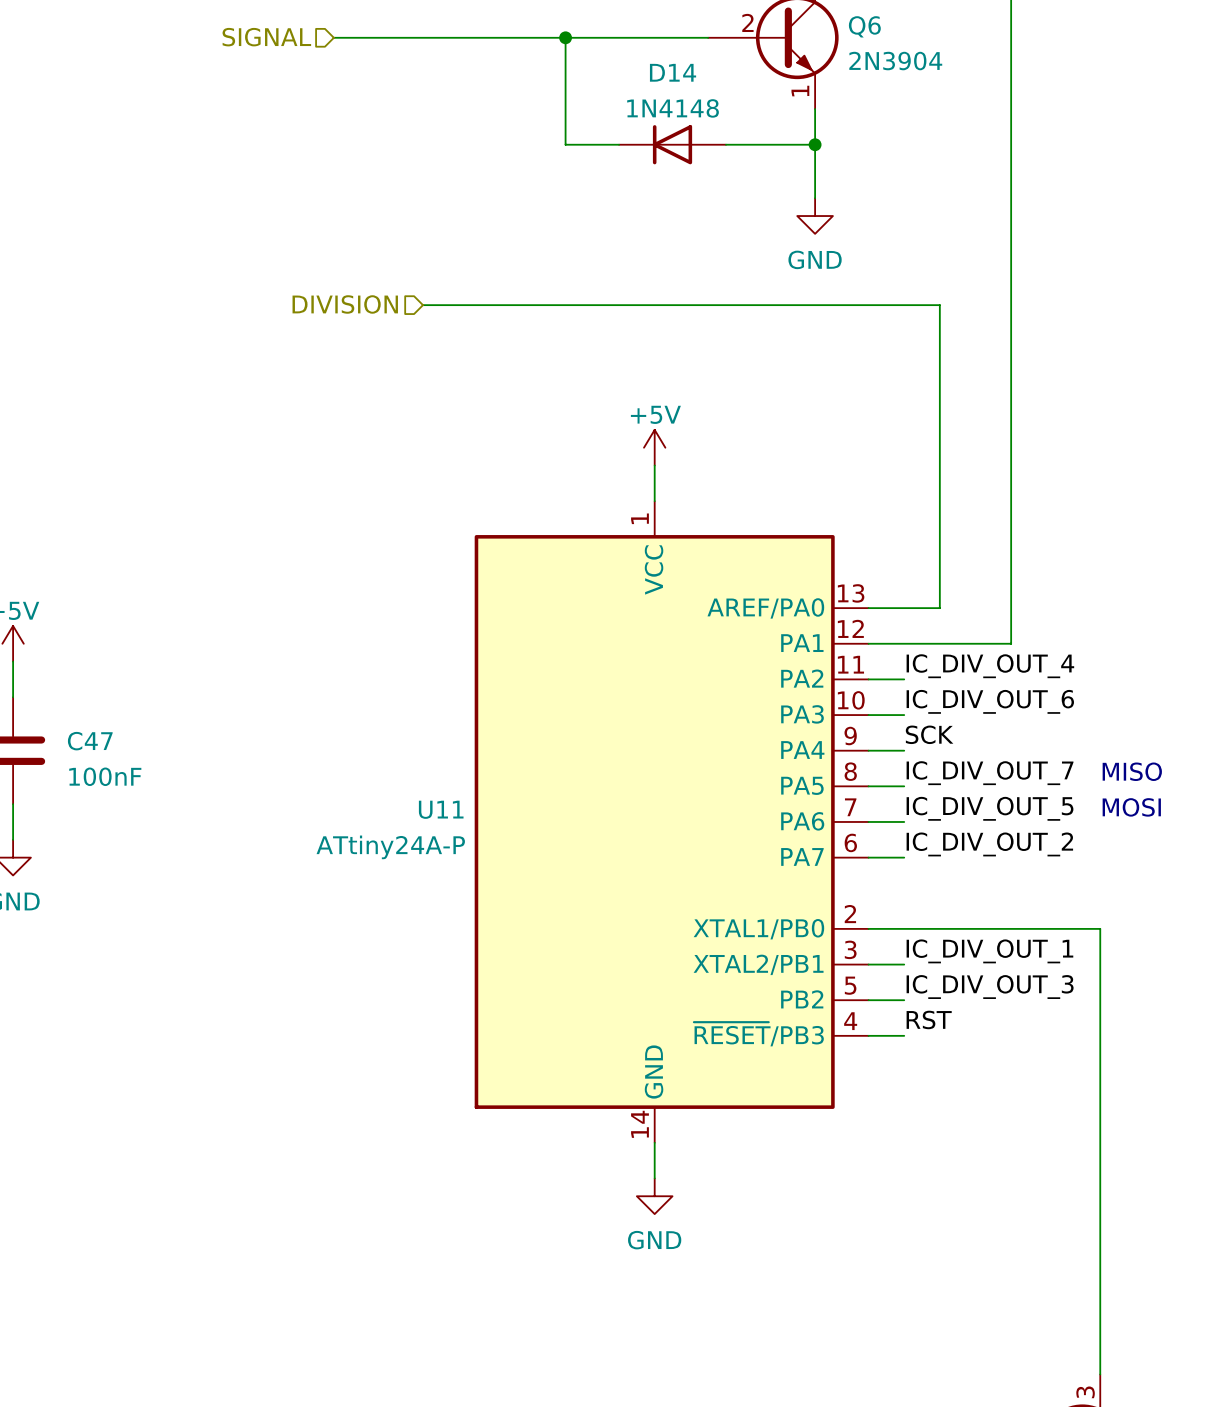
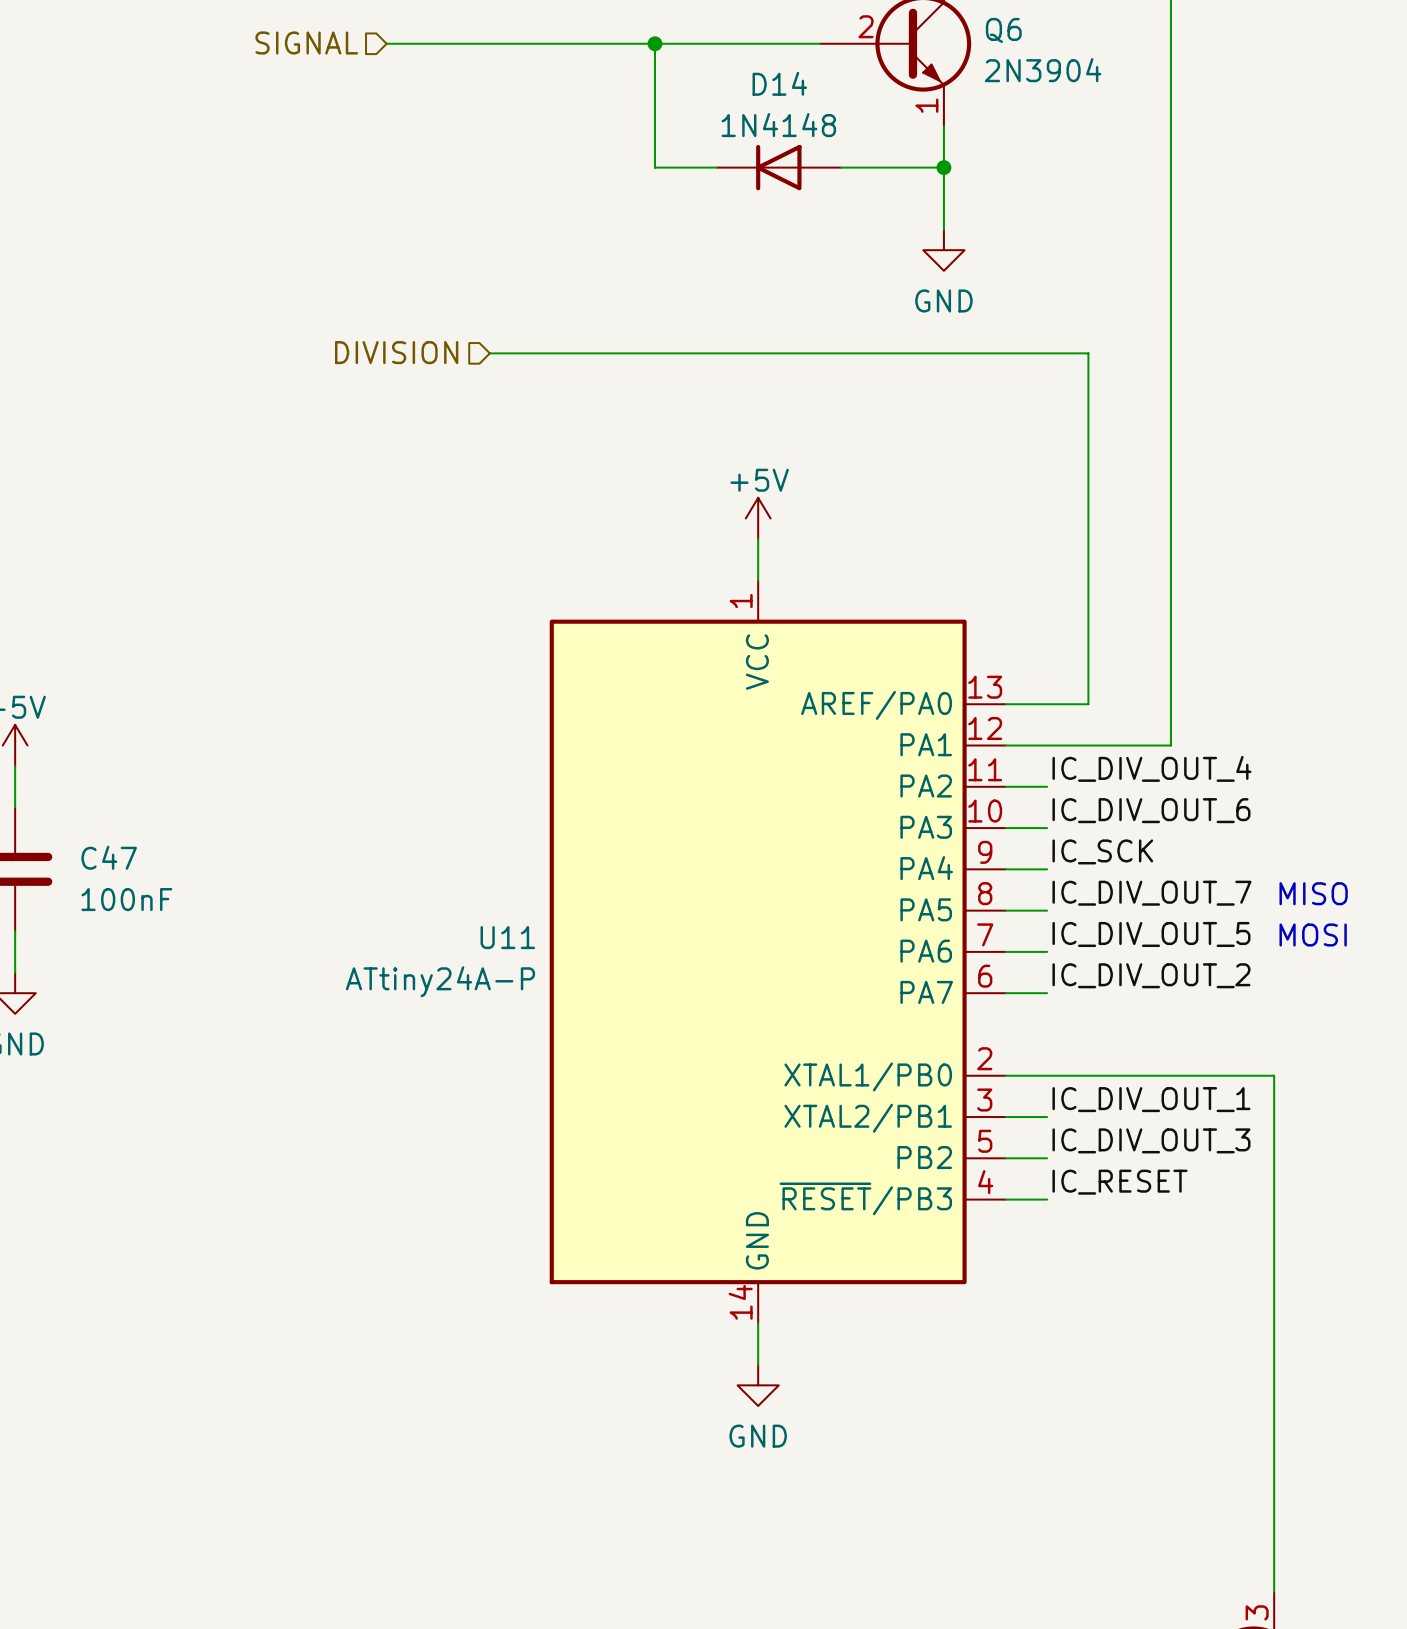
label: SCK (929, 734) -> IC_SCK (1102, 851)
label: RST (929, 1019) -> IC_RESET (1120, 1182)

